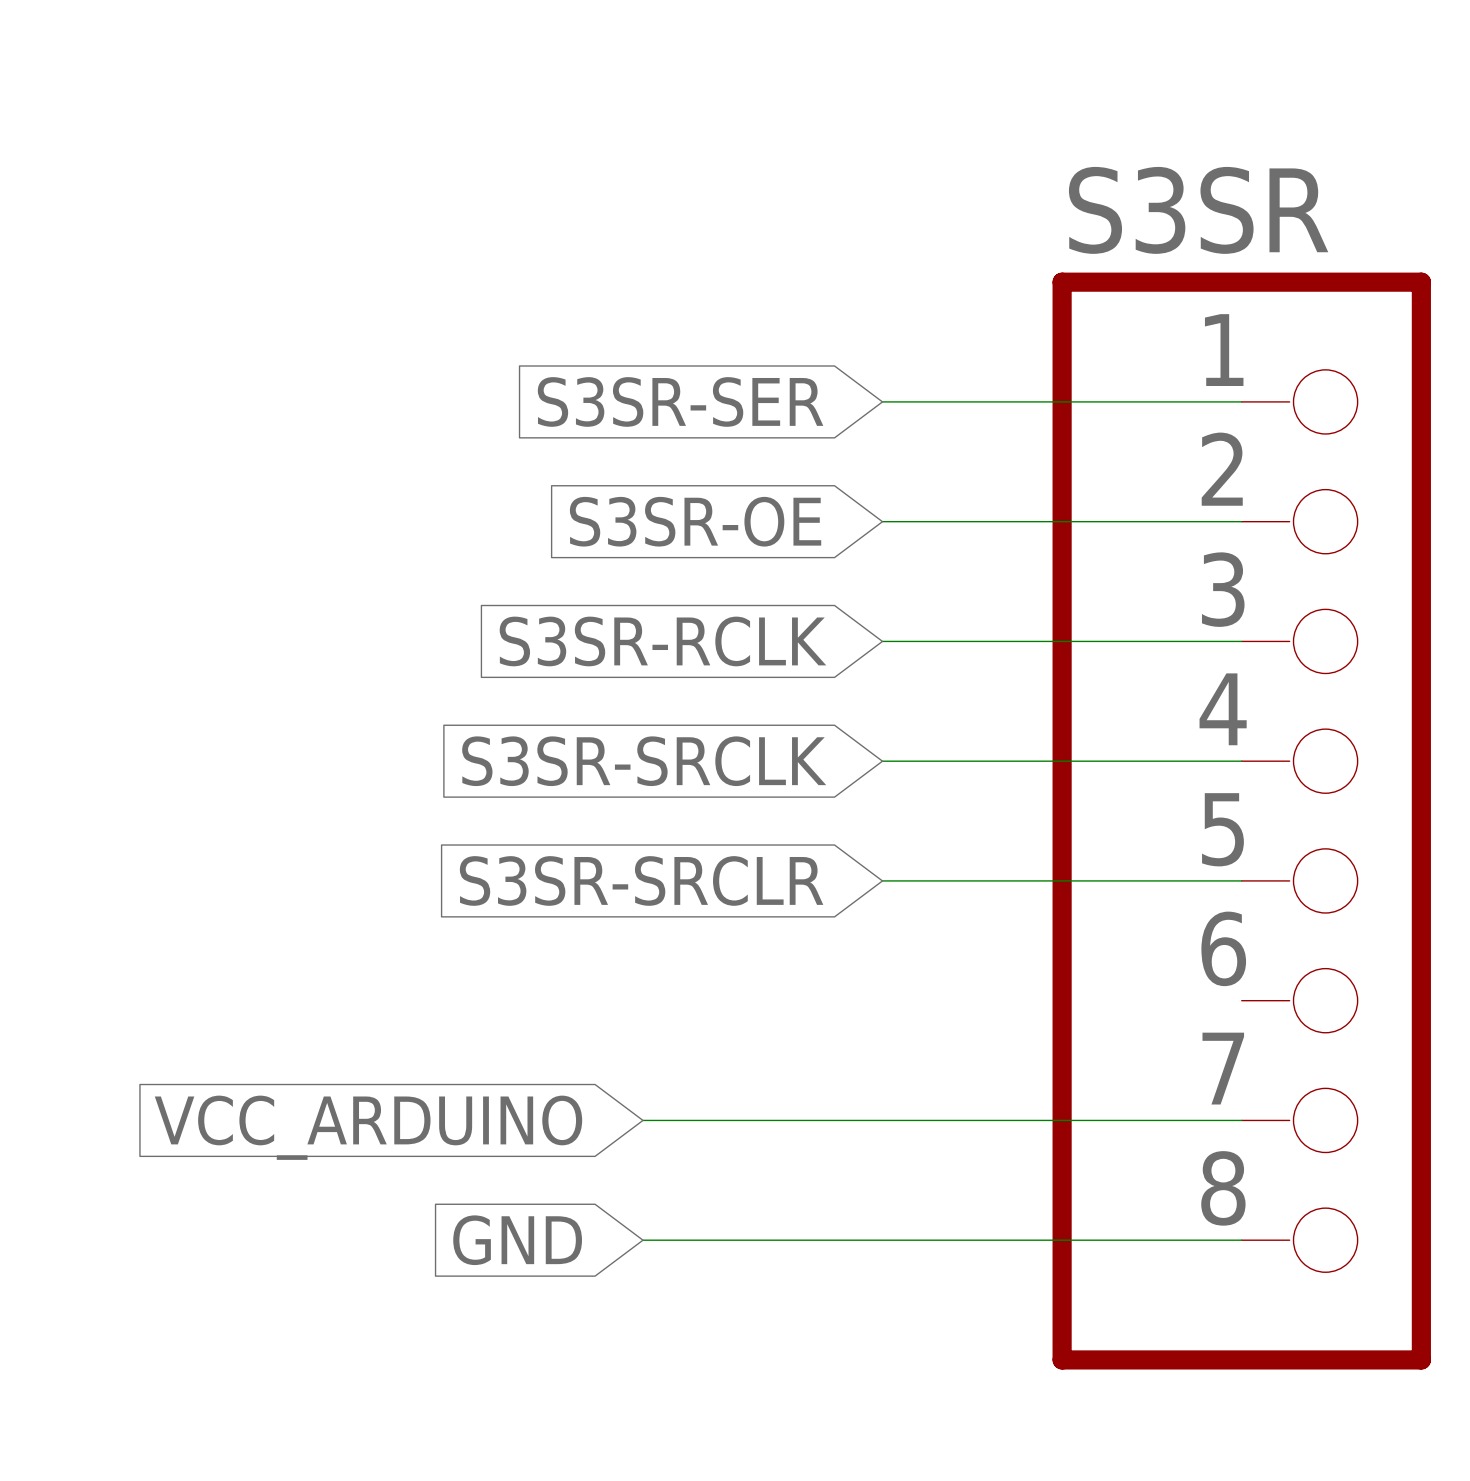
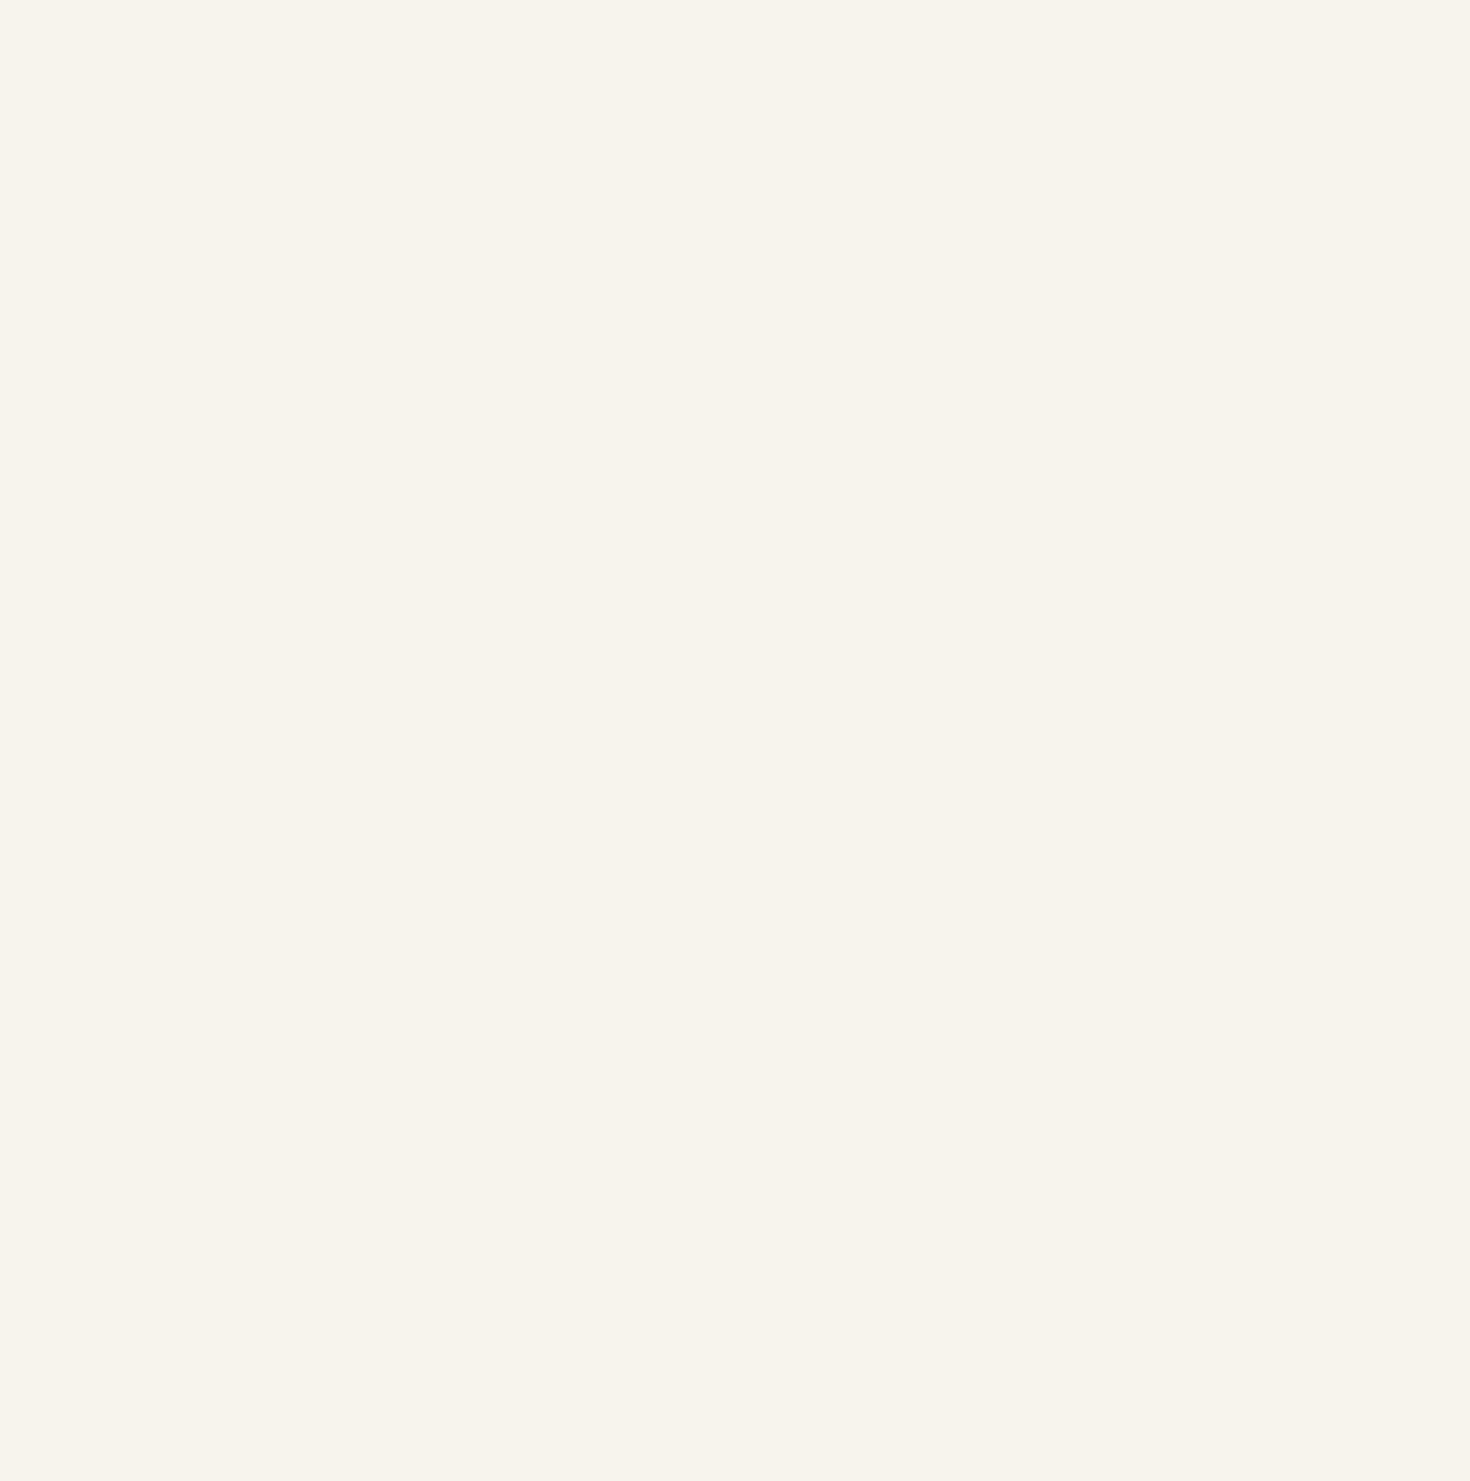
global label: S3SR-SER (680, 401) -> none
wire: (882, 401) (1241, 401) -> none
global label: S3SR-OE (695, 521) -> none
wire: (882, 521) (1241, 521) -> none
global label: S3SR-RCLK (662, 641) -> none
wire: (882, 641) (1241, 641) -> none
global label: S3SR-SRCLK (644, 761) -> none
wire: (882, 761) (1241, 761) -> none
S3SR: (1241, 821) -> none
global label: S3SR-SRCLR (641, 880) -> none
wire: (882, 880) (1241, 880) -> none
wire: (642, 1120) (1241, 1120) -> none
global label: VCC_ARDUINO (368, 1127) -> none
global label: GND (517, 1240) -> none
wire: (642, 1240) (1241, 1240) -> none

